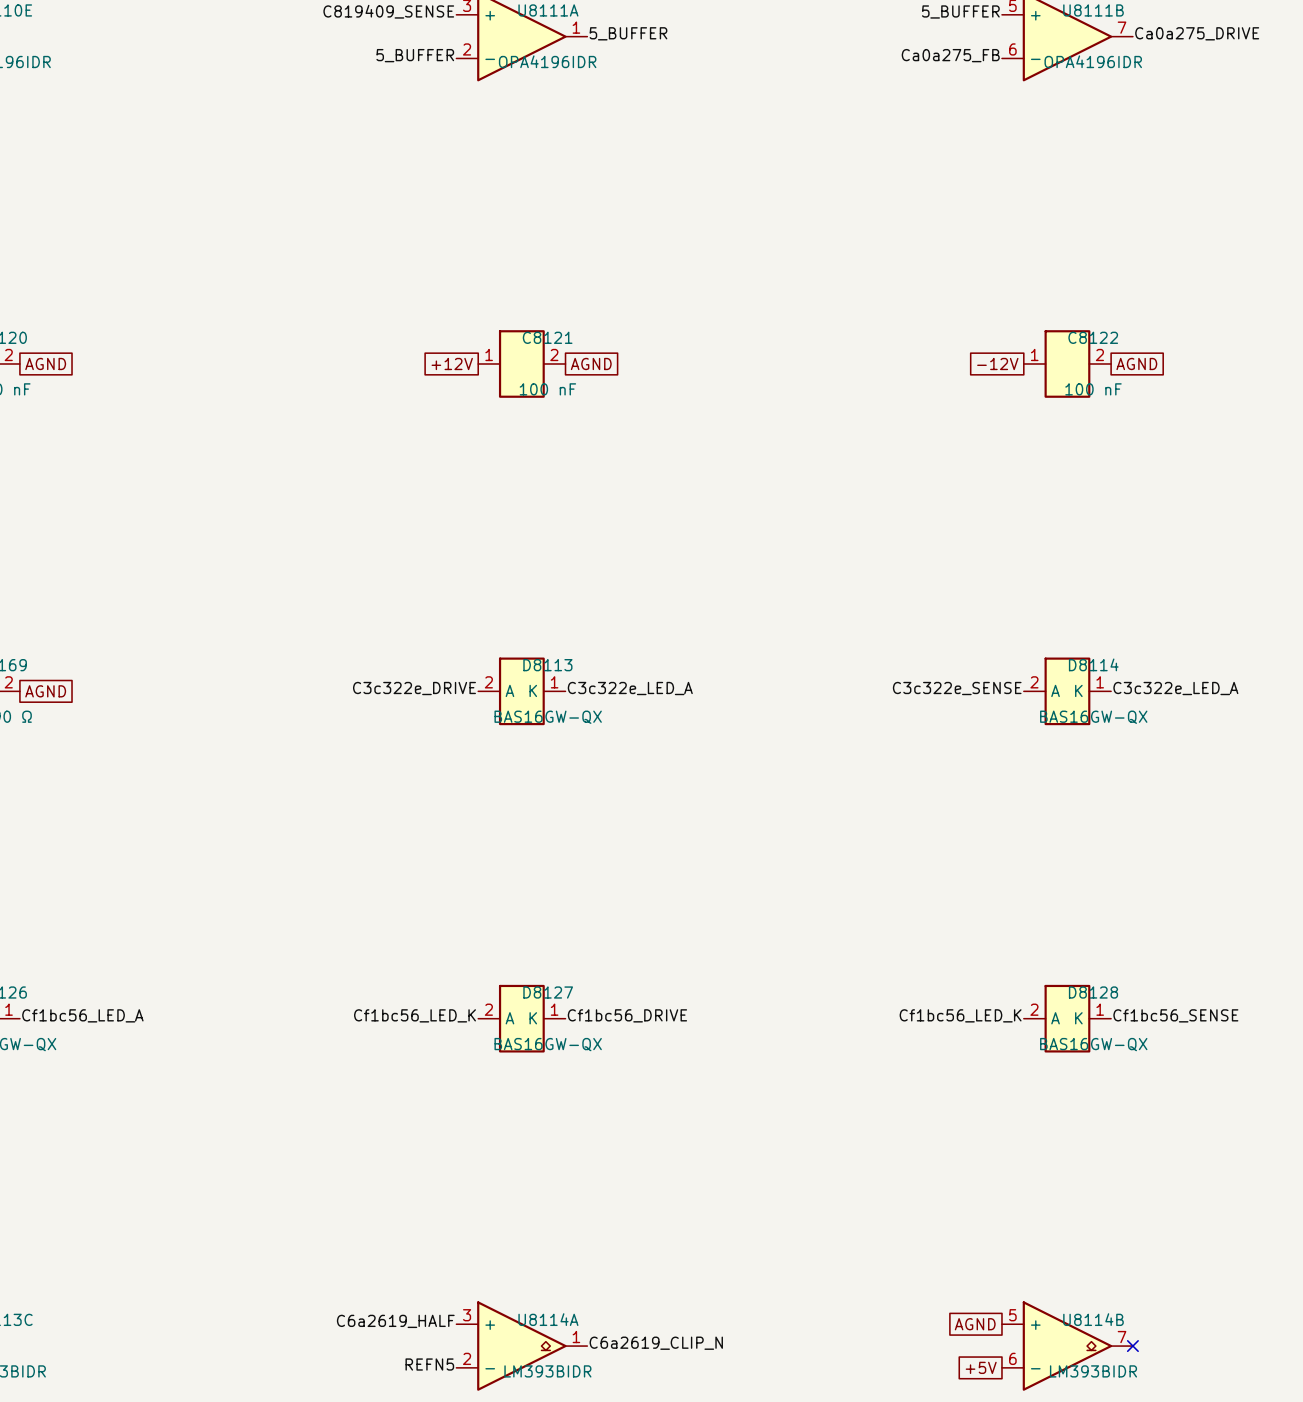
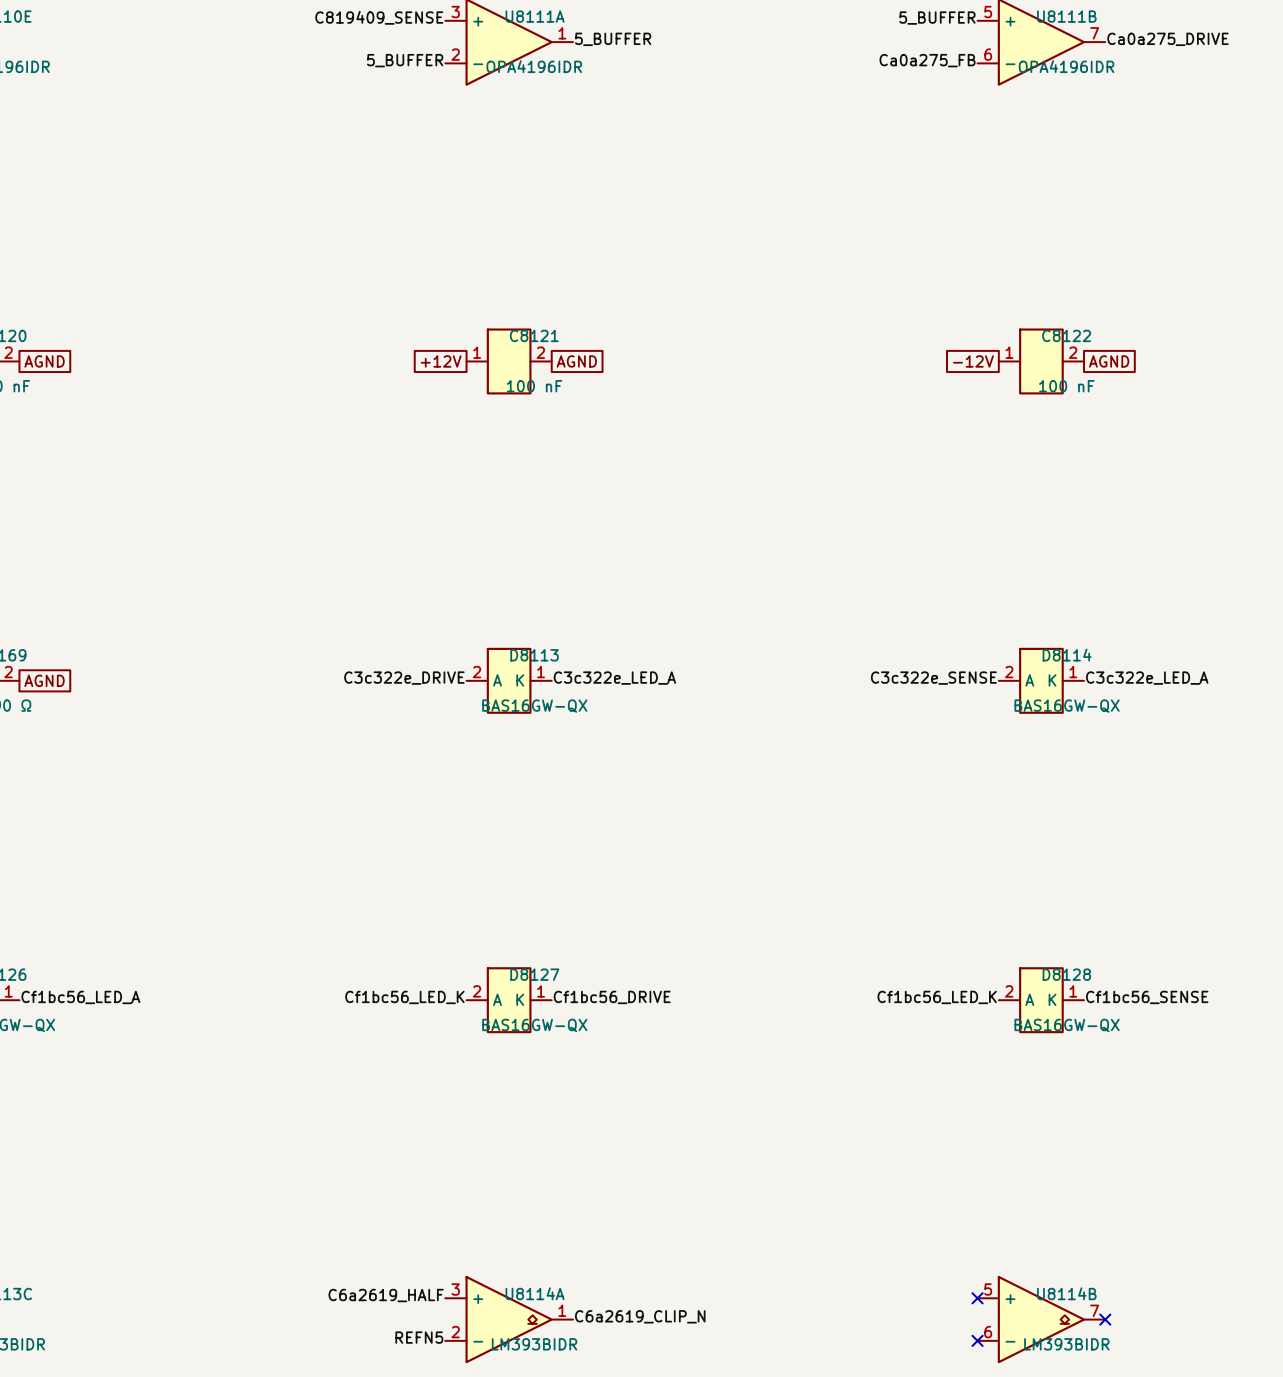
global label: AGND (975, 1324) -> none
no-connect mark: none -> (977, 1298)
global label: +5V (981, 1367) -> none
no-connect mark: none -> (977, 1340)

